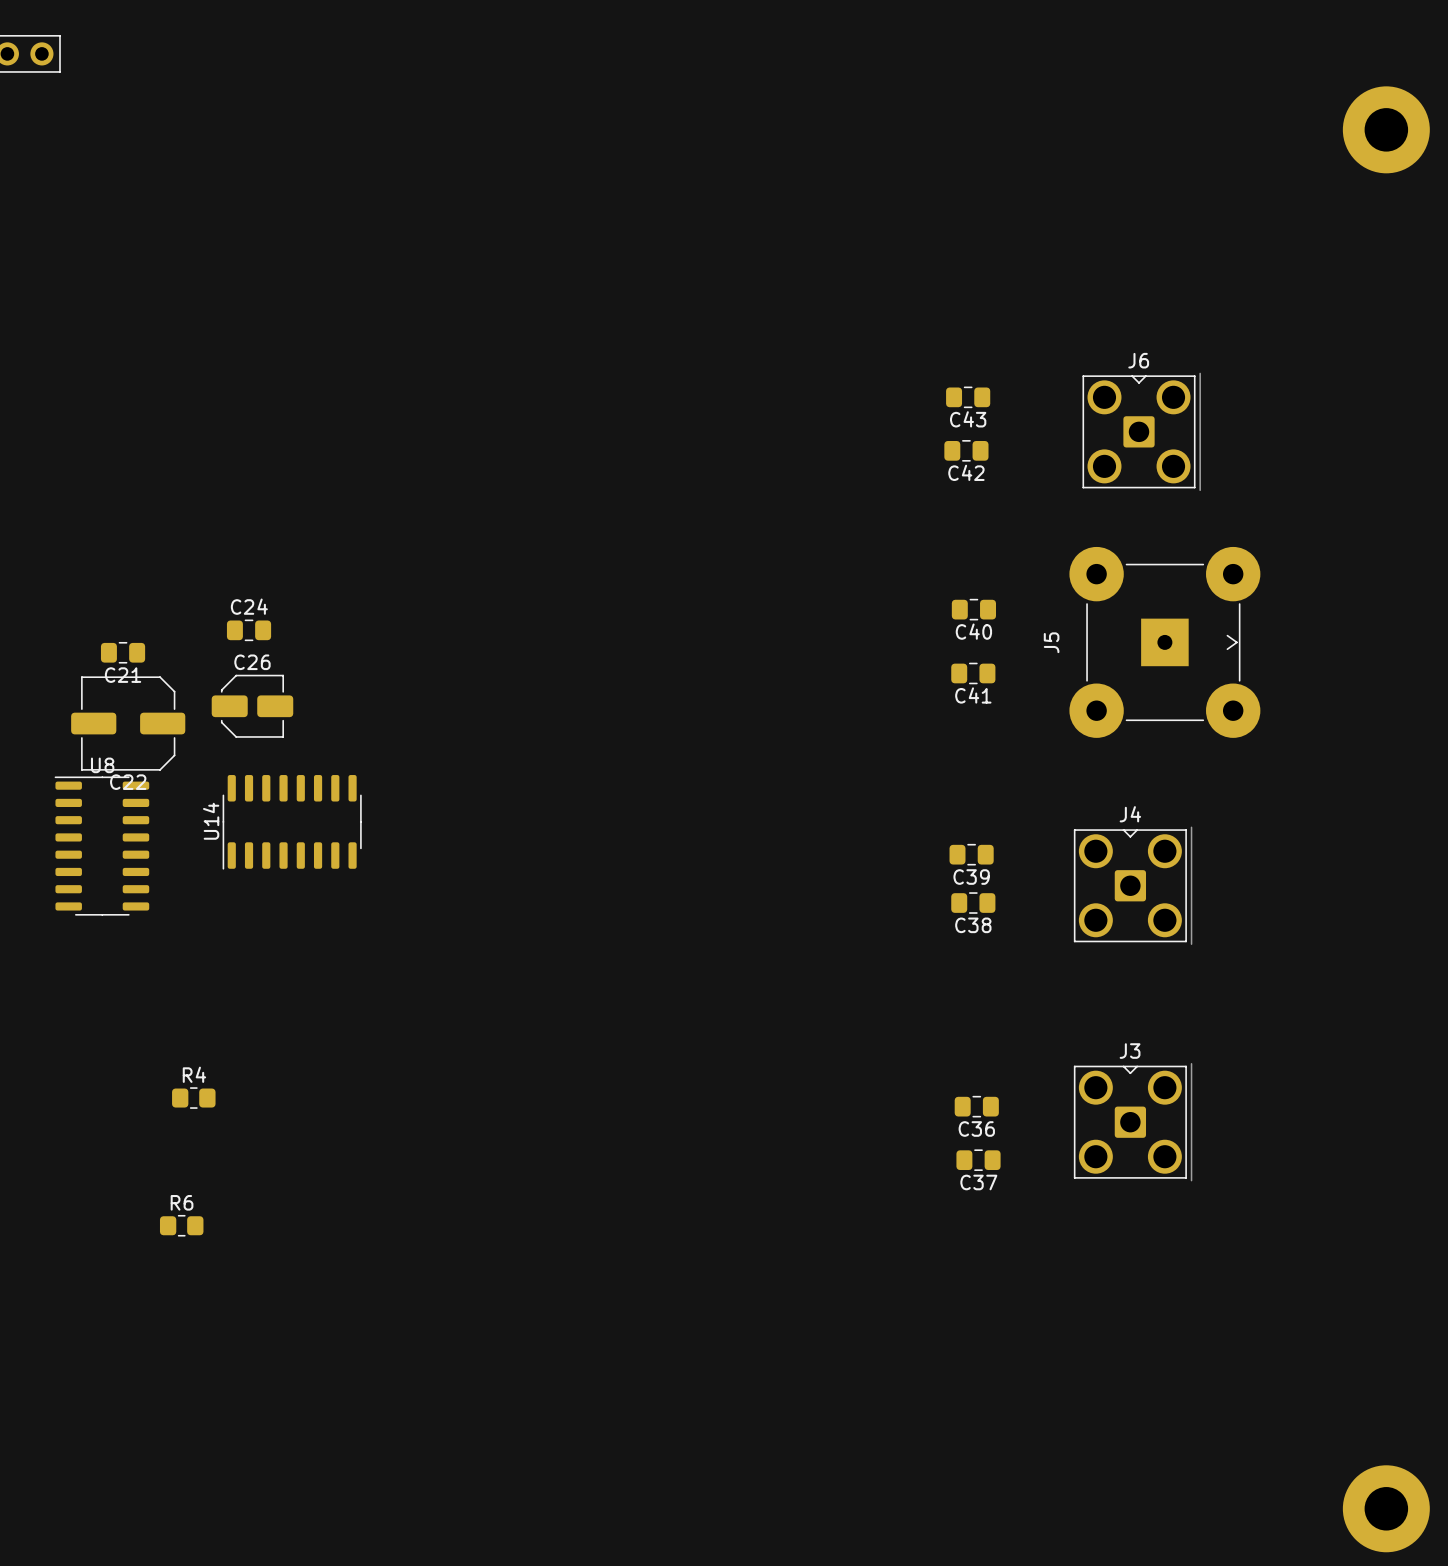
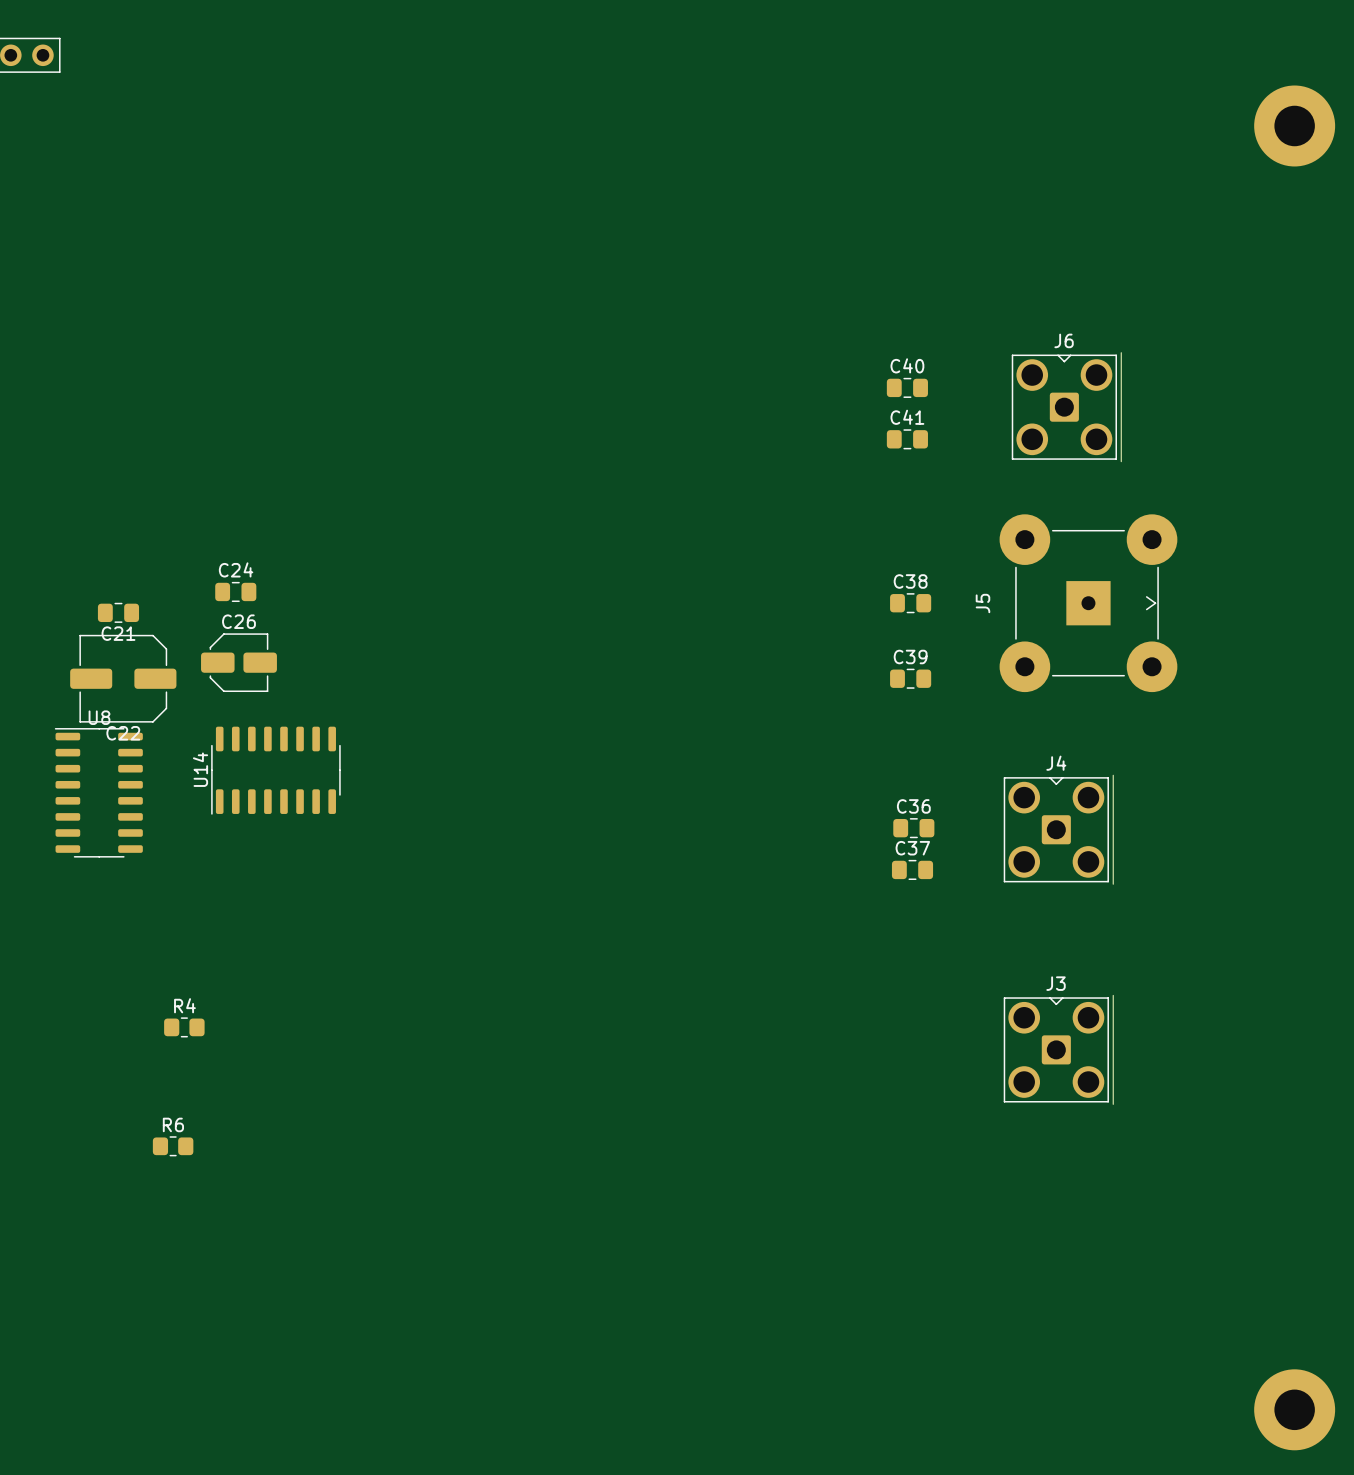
C43: (968, 397) -> none
C42: (966, 450) -> none
C40 position: (973, 609) -> (907, 387)
C40 name position: C40 (973, 631) -> C40 (907, 365)
C41 position: (973, 673) -> (907, 439)
C41 name position: C41 (973, 695) -> C41 (907, 417)
C39 position: (971, 854) -> (910, 678)
C39 name position: C39 (971, 877) -> C39 (910, 657)
C38 position: (973, 903) -> (910, 603)
C38 name position: C38 (973, 925) -> C38 (910, 581)
C36 position: (976, 1106) -> (913, 828)
C36 name position: C36 (976, 1128) -> C36 (913, 806)
C37 position: (978, 1160) -> (912, 869)
C37 name position: C37 (978, 1182) -> C37 (912, 848)

